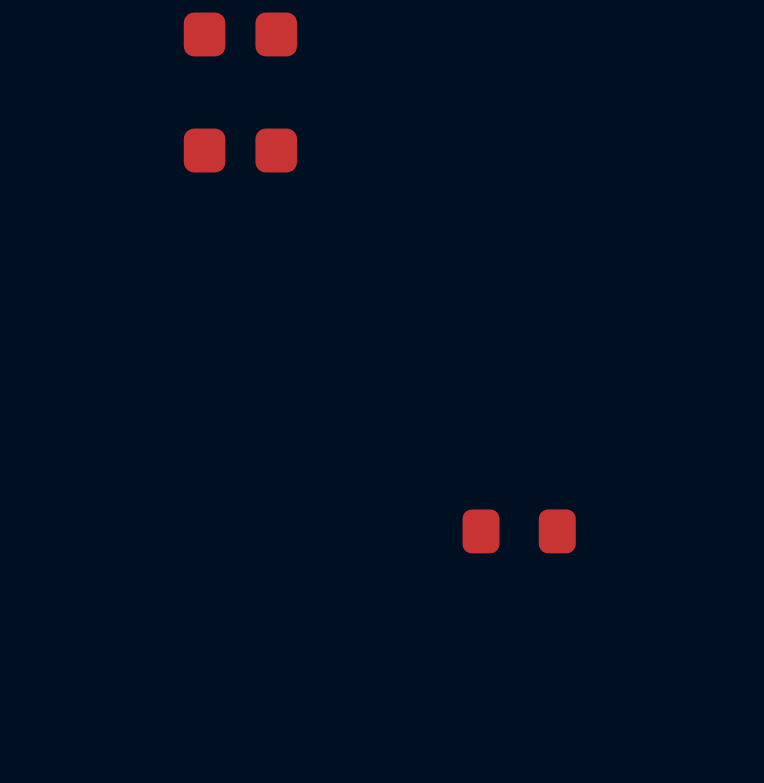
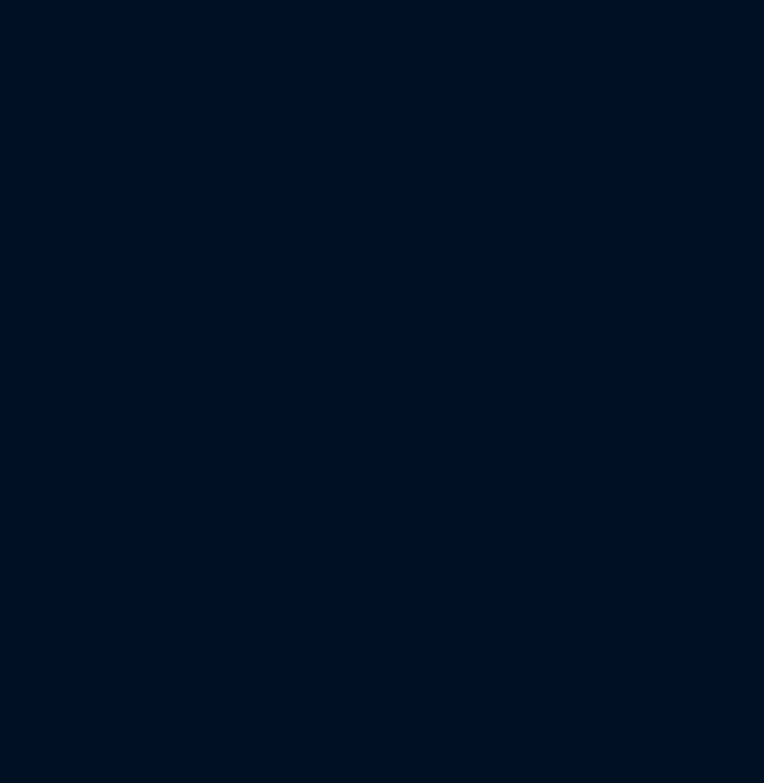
part: (240, 34) -> none
part: (240, 150) -> none
part: (519, 531) -> none

